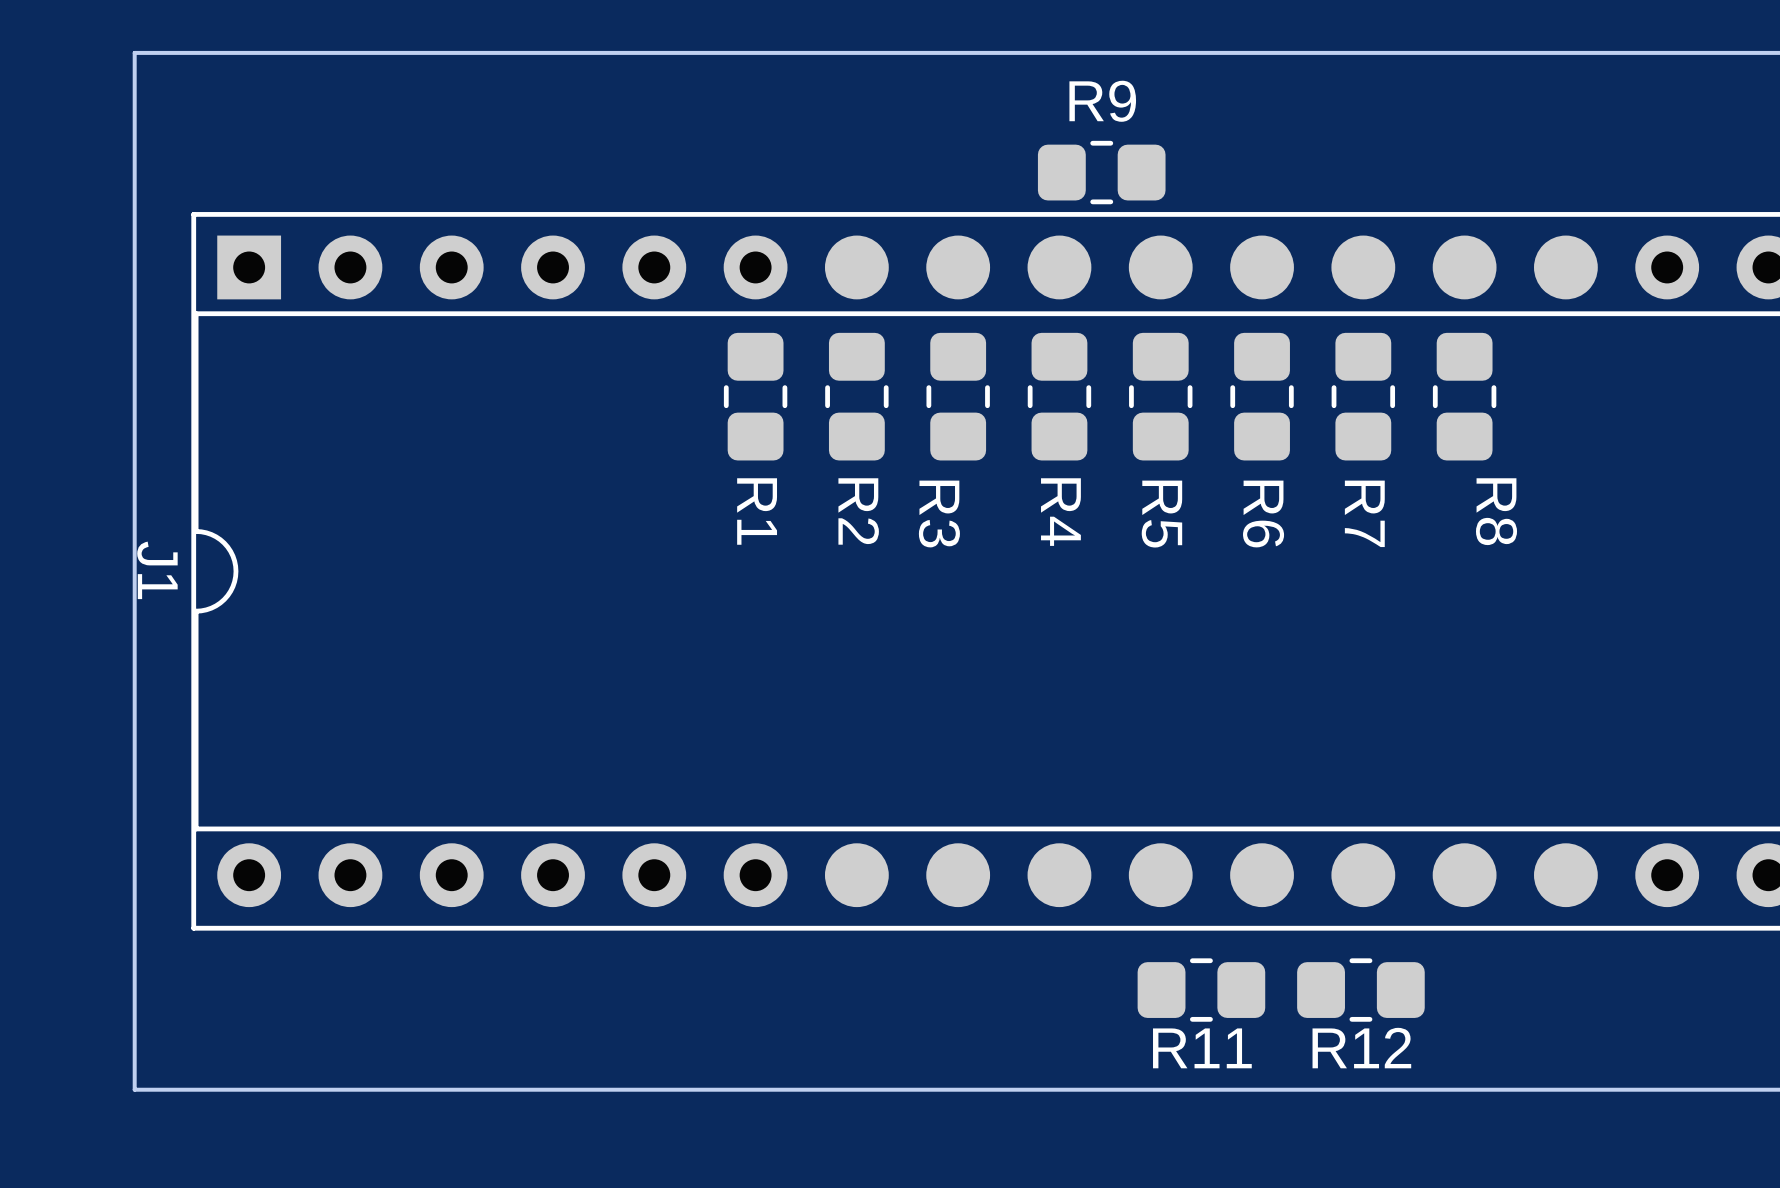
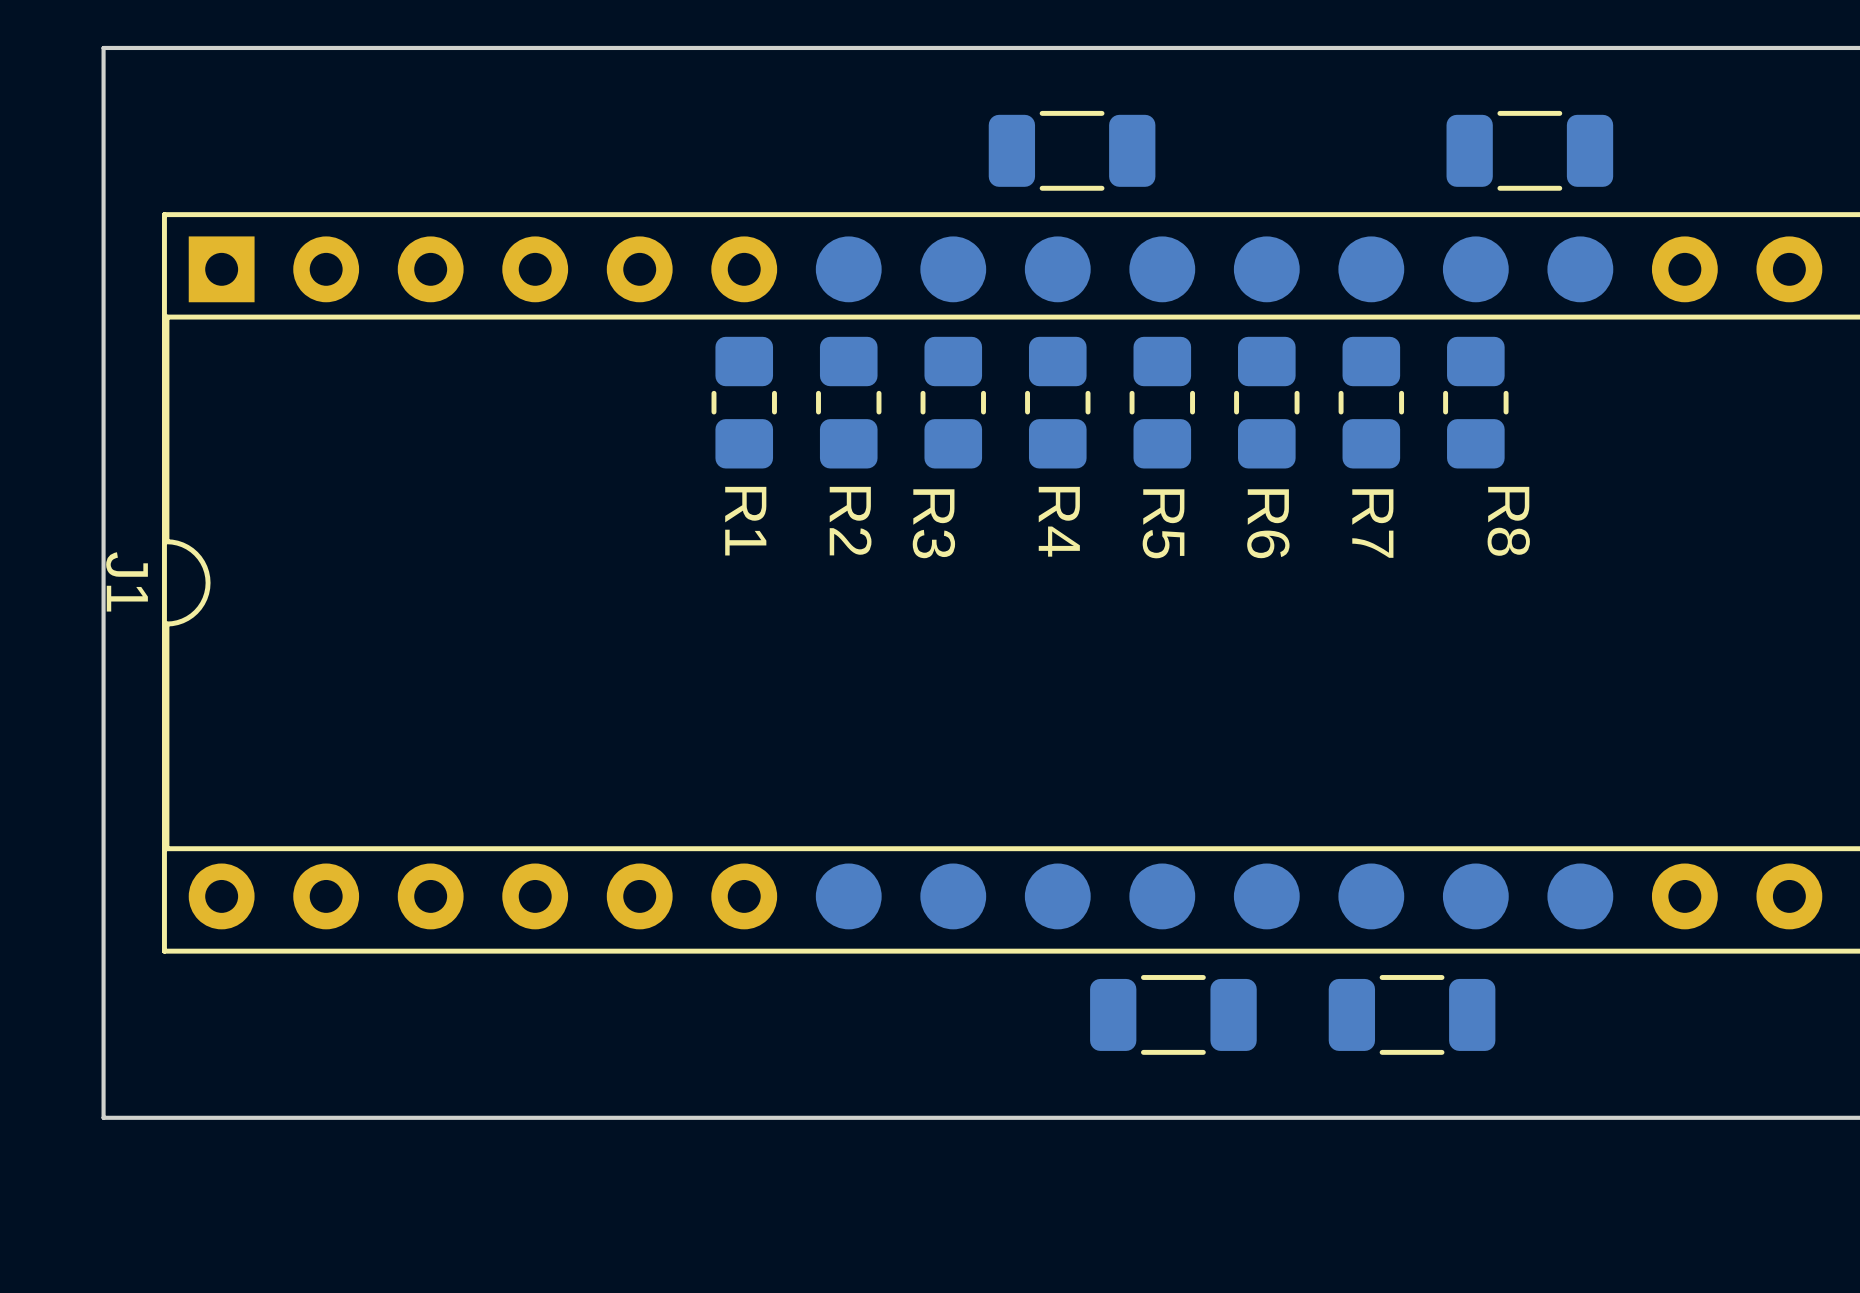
part: none -> (1072, 150)
part: none -> (1529, 150)
R9: (1101, 172) -> none
part: none -> (1173, 1014)
R11: (1201, 990) -> none
R12: (1360, 990) -> none
part: none -> (1412, 1014)

